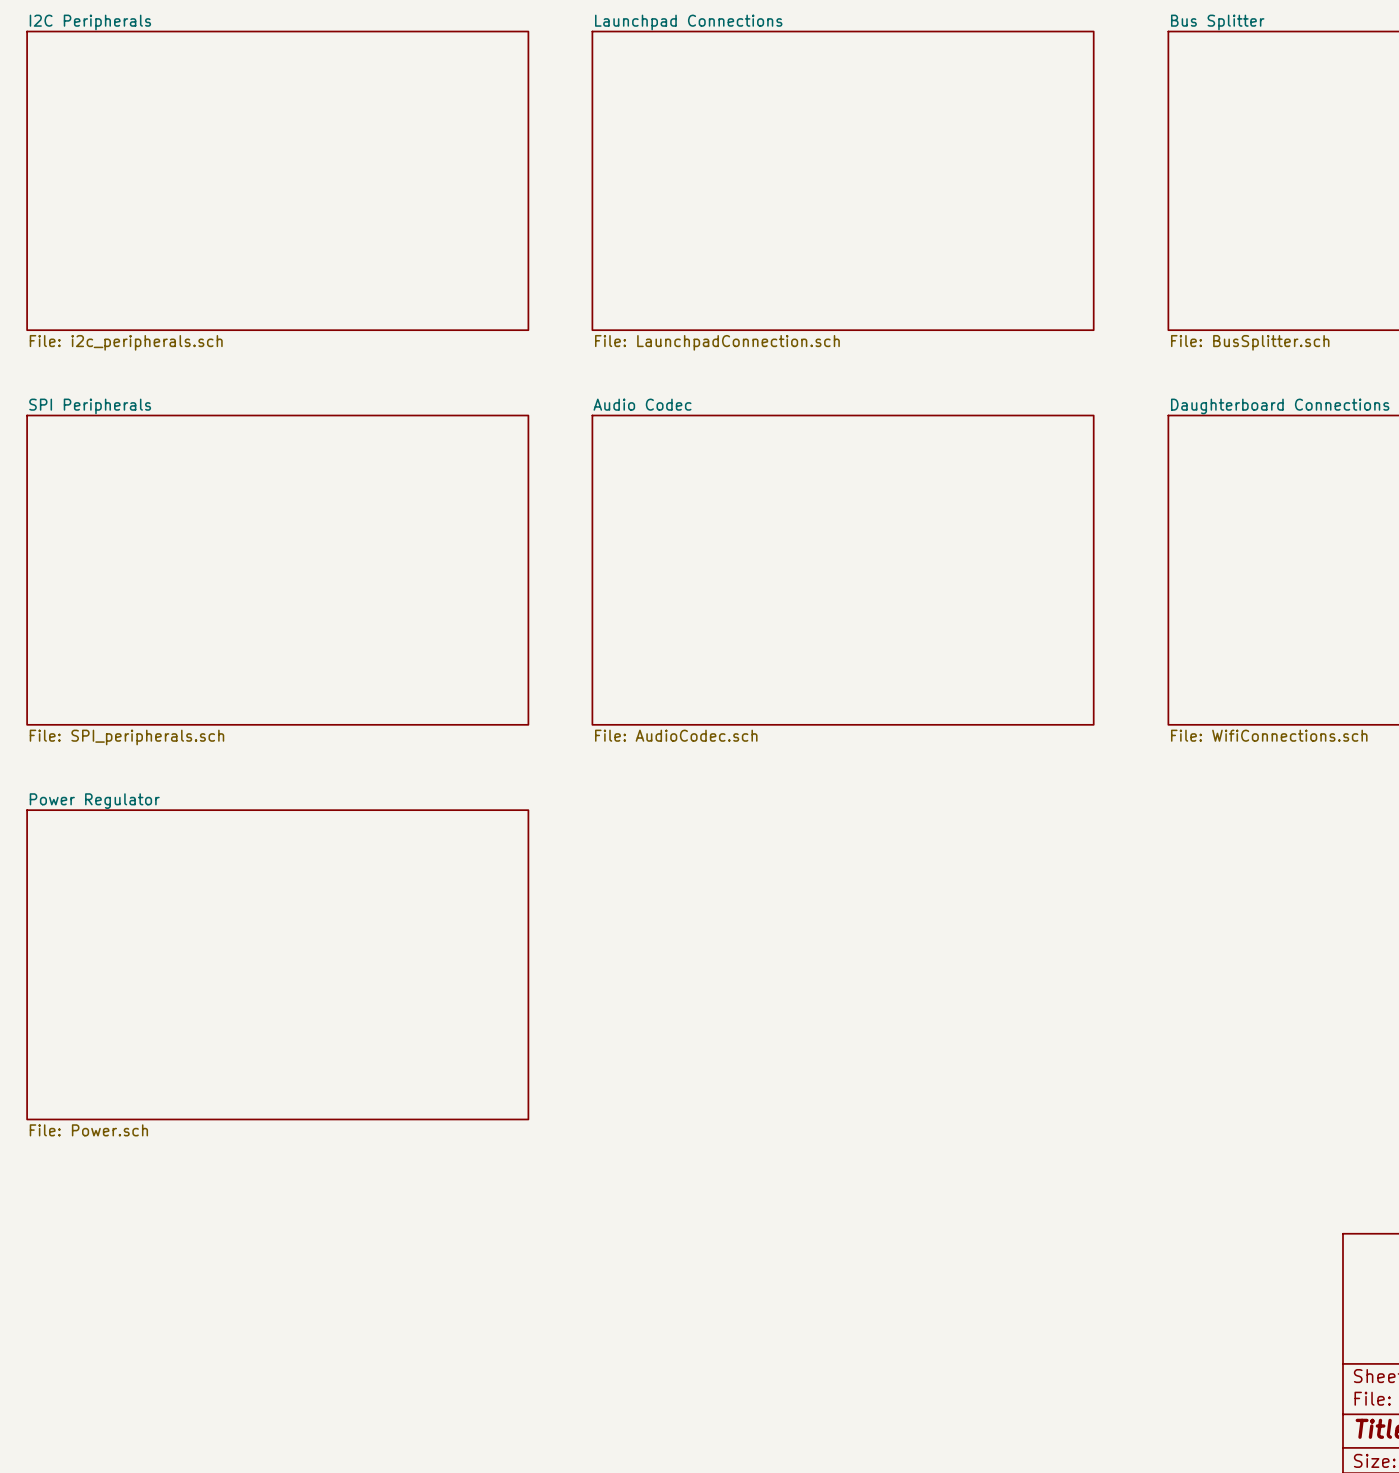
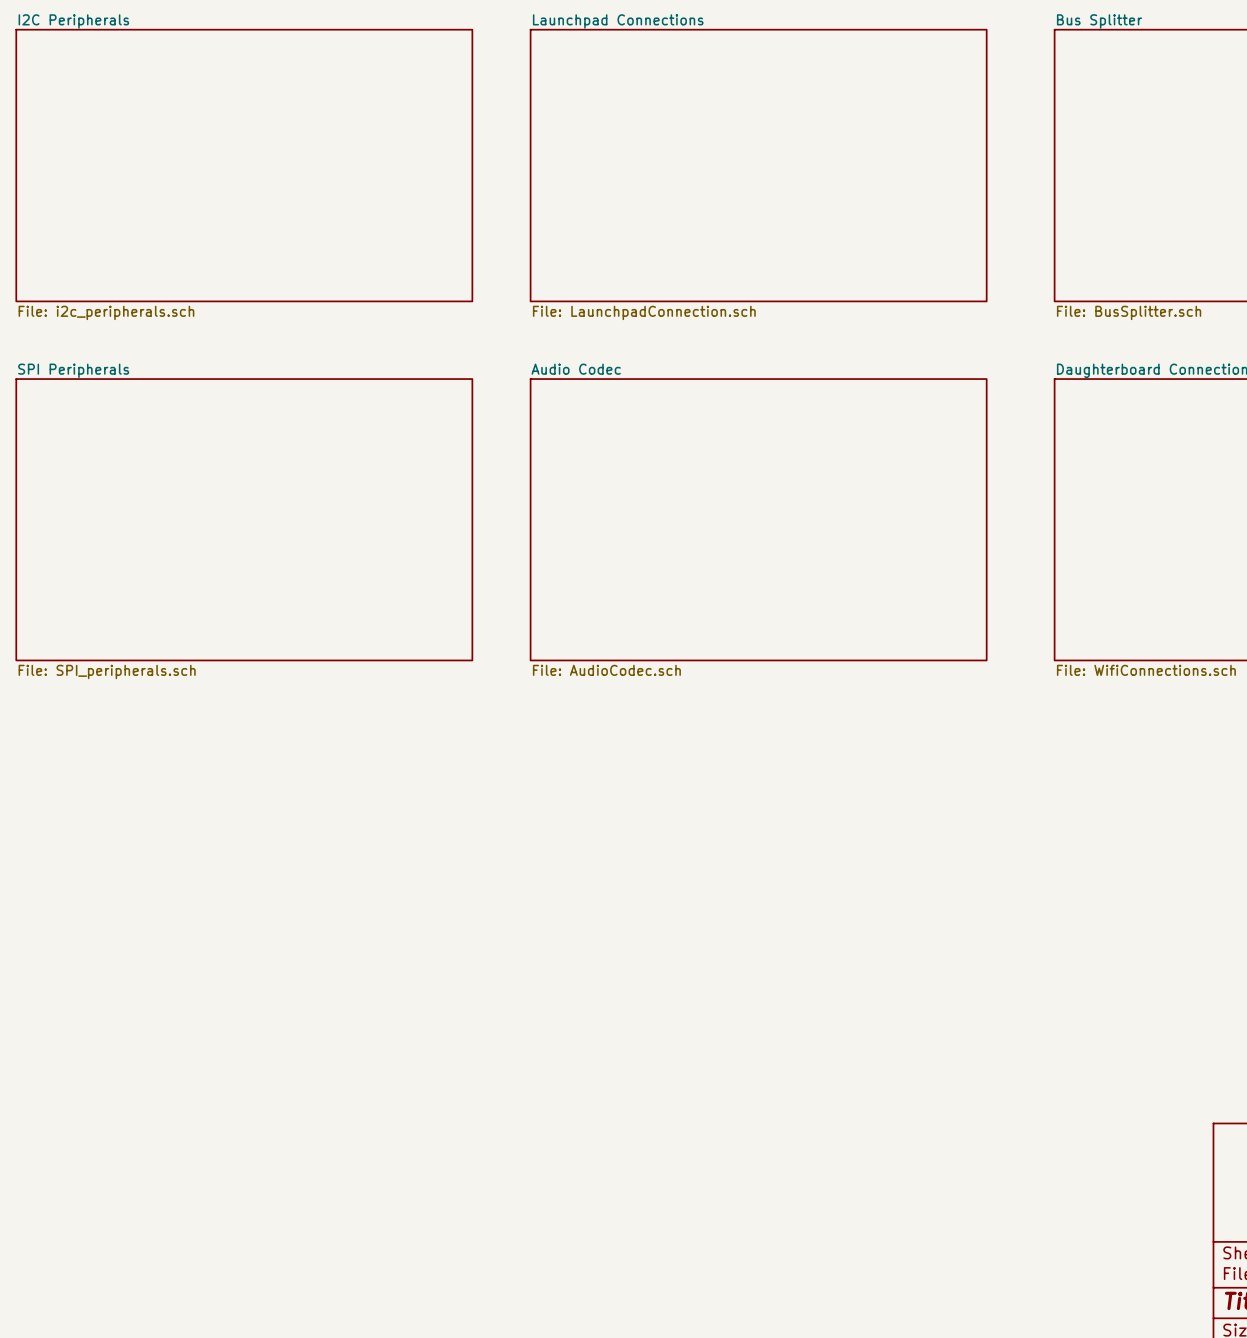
sheet Power Regulator: File: Power.sch (277, 964) -> none

